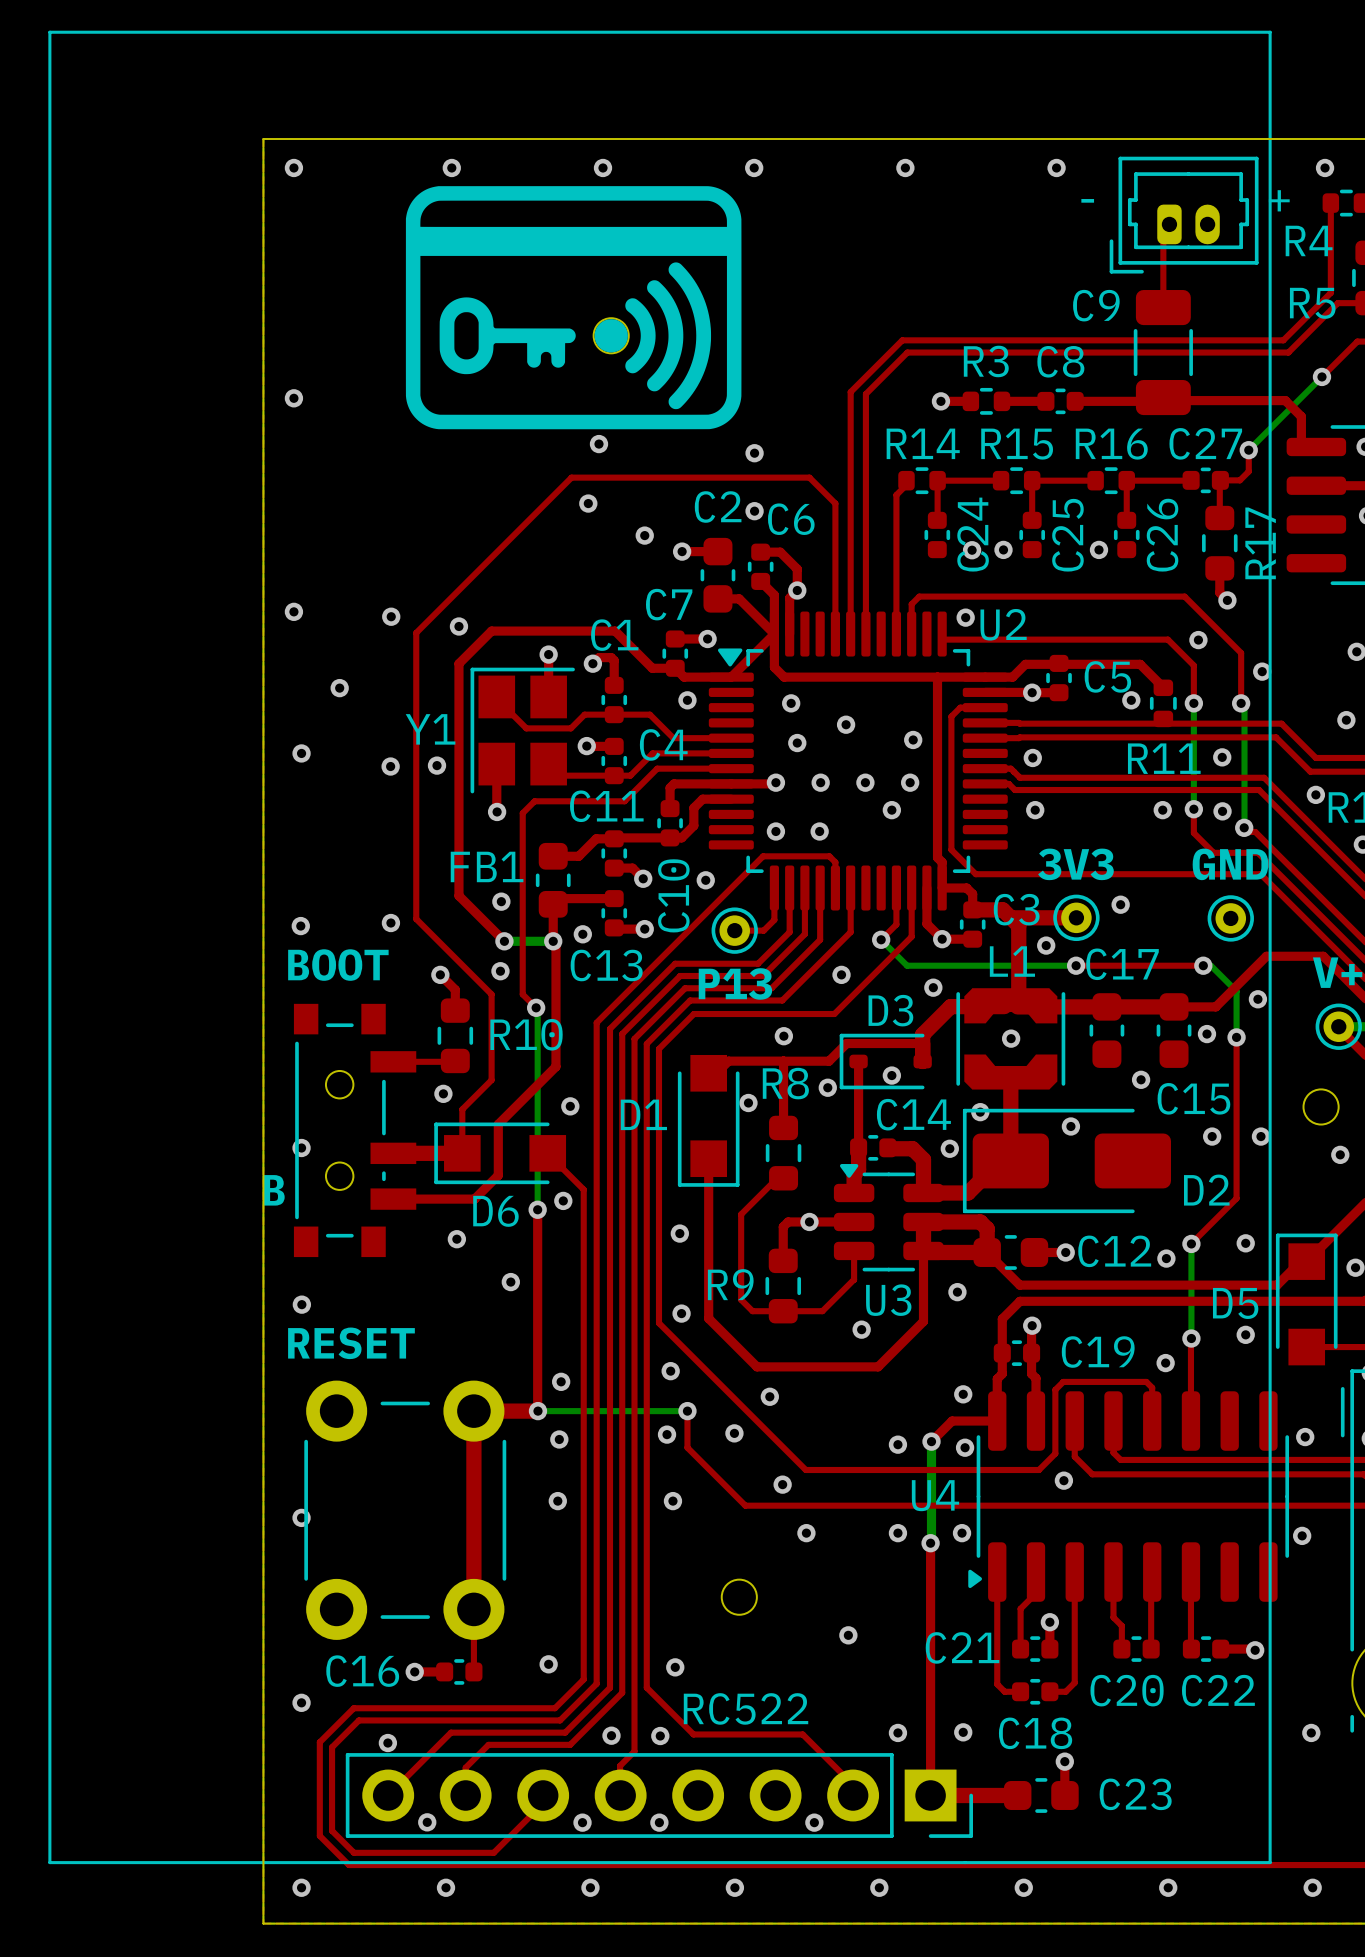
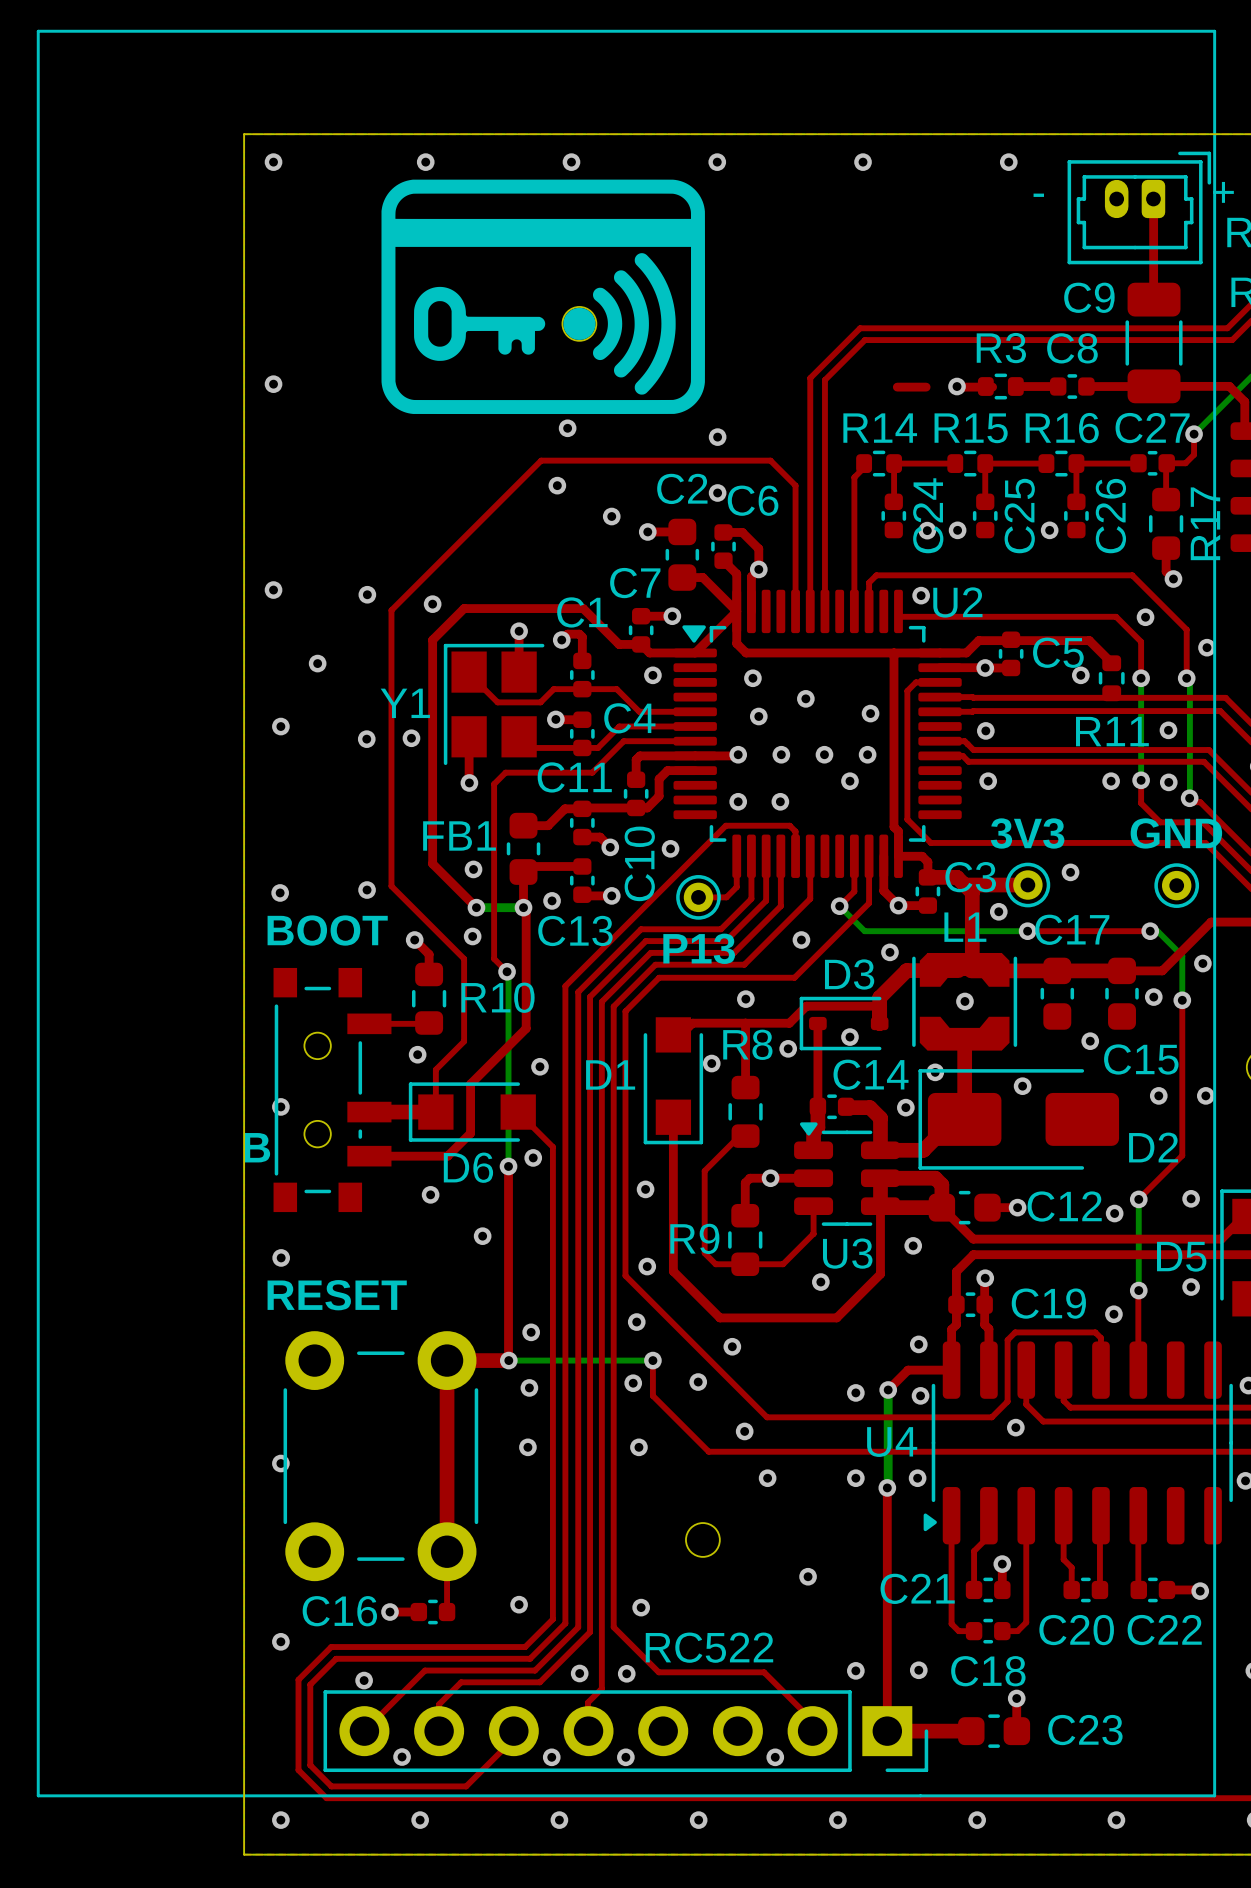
top track: none -> (1153, 197) (1153, 299)
part rotation: 0° (1184, 215) -> 180° (1139, 207)
top track: (1169, 224) (1163, 230) (1163, 307) -> none
C9 position: (1163, 352) -> (1154, 343)
top track: none -> (1015, 386) (1052, 386)
via position: (940, 401) -> (957, 386)
R3 position: (986, 401) -> (1000, 386)
C8 position: (1060, 401) -> (1072, 386)
top track: (1075, 401) (1145, 401) -> none

